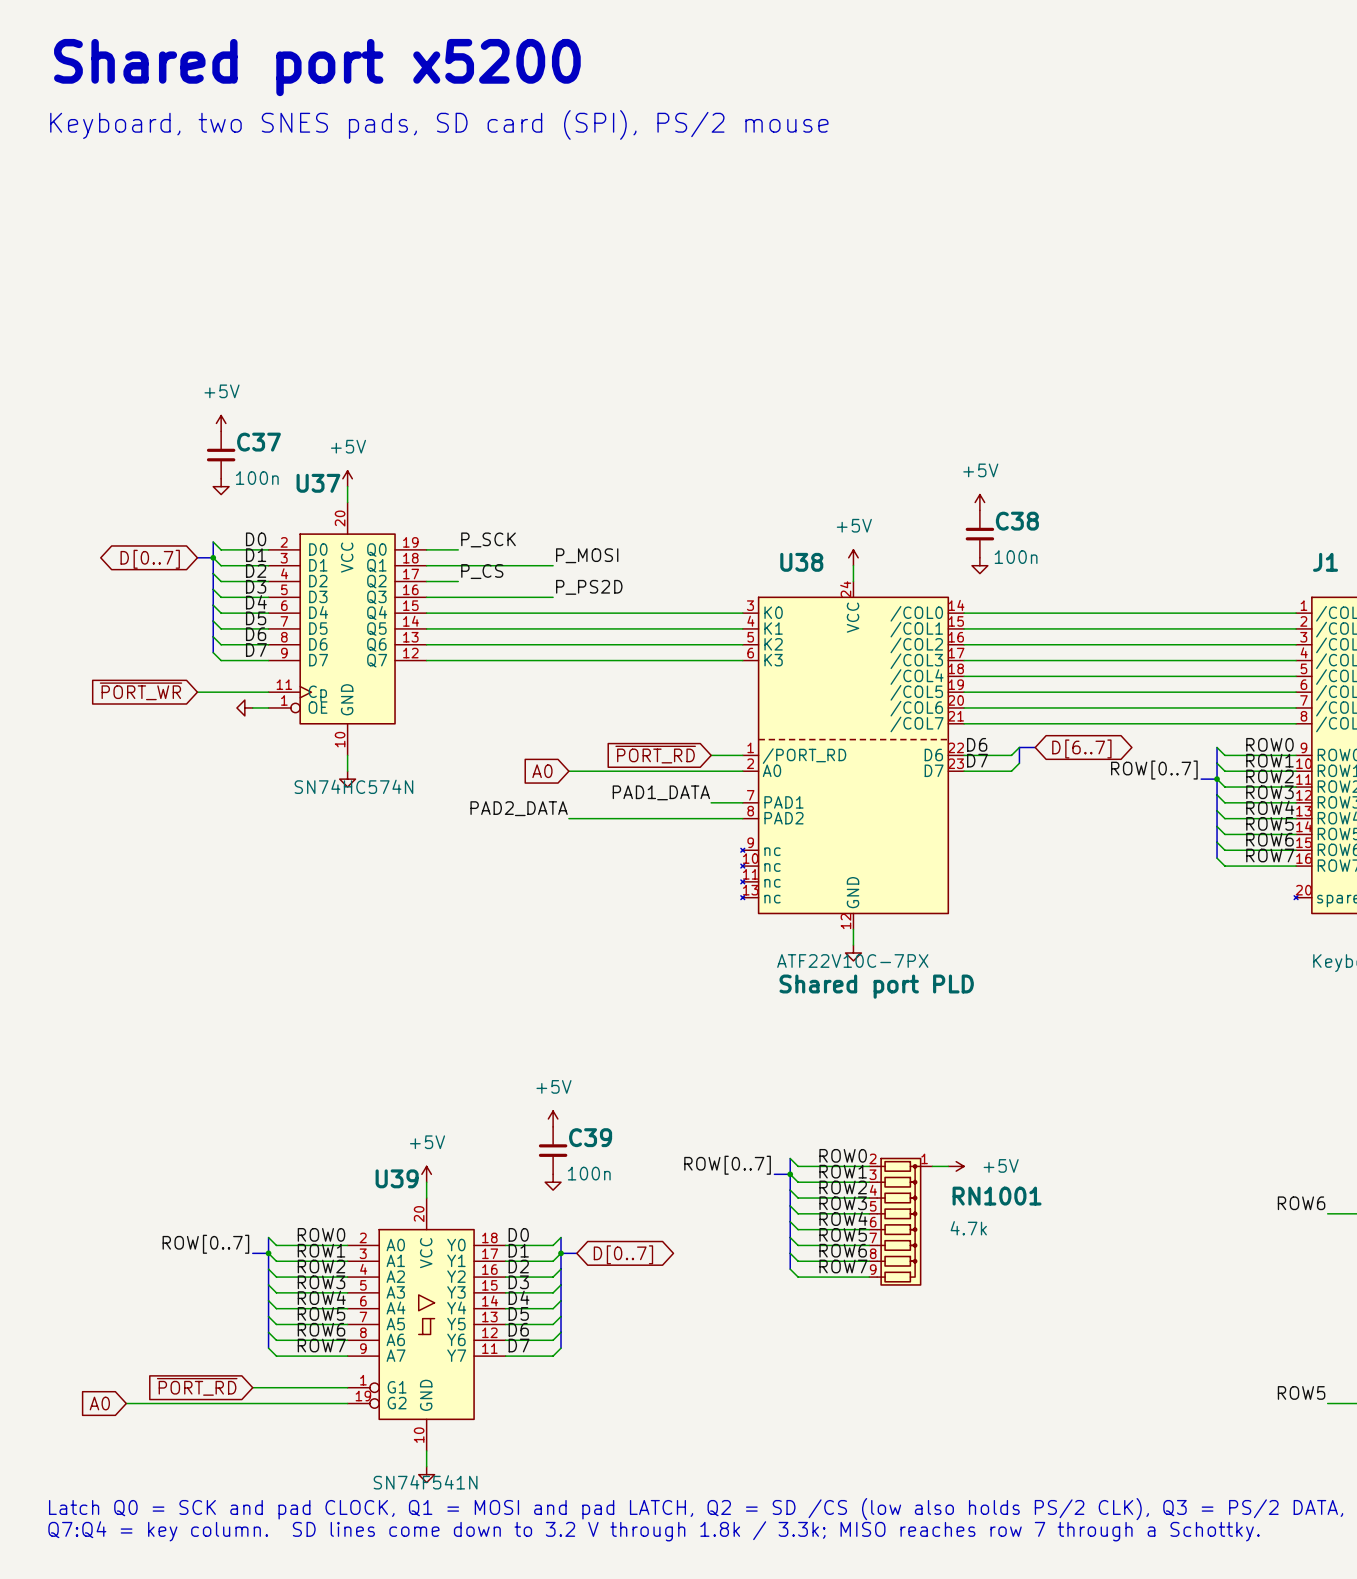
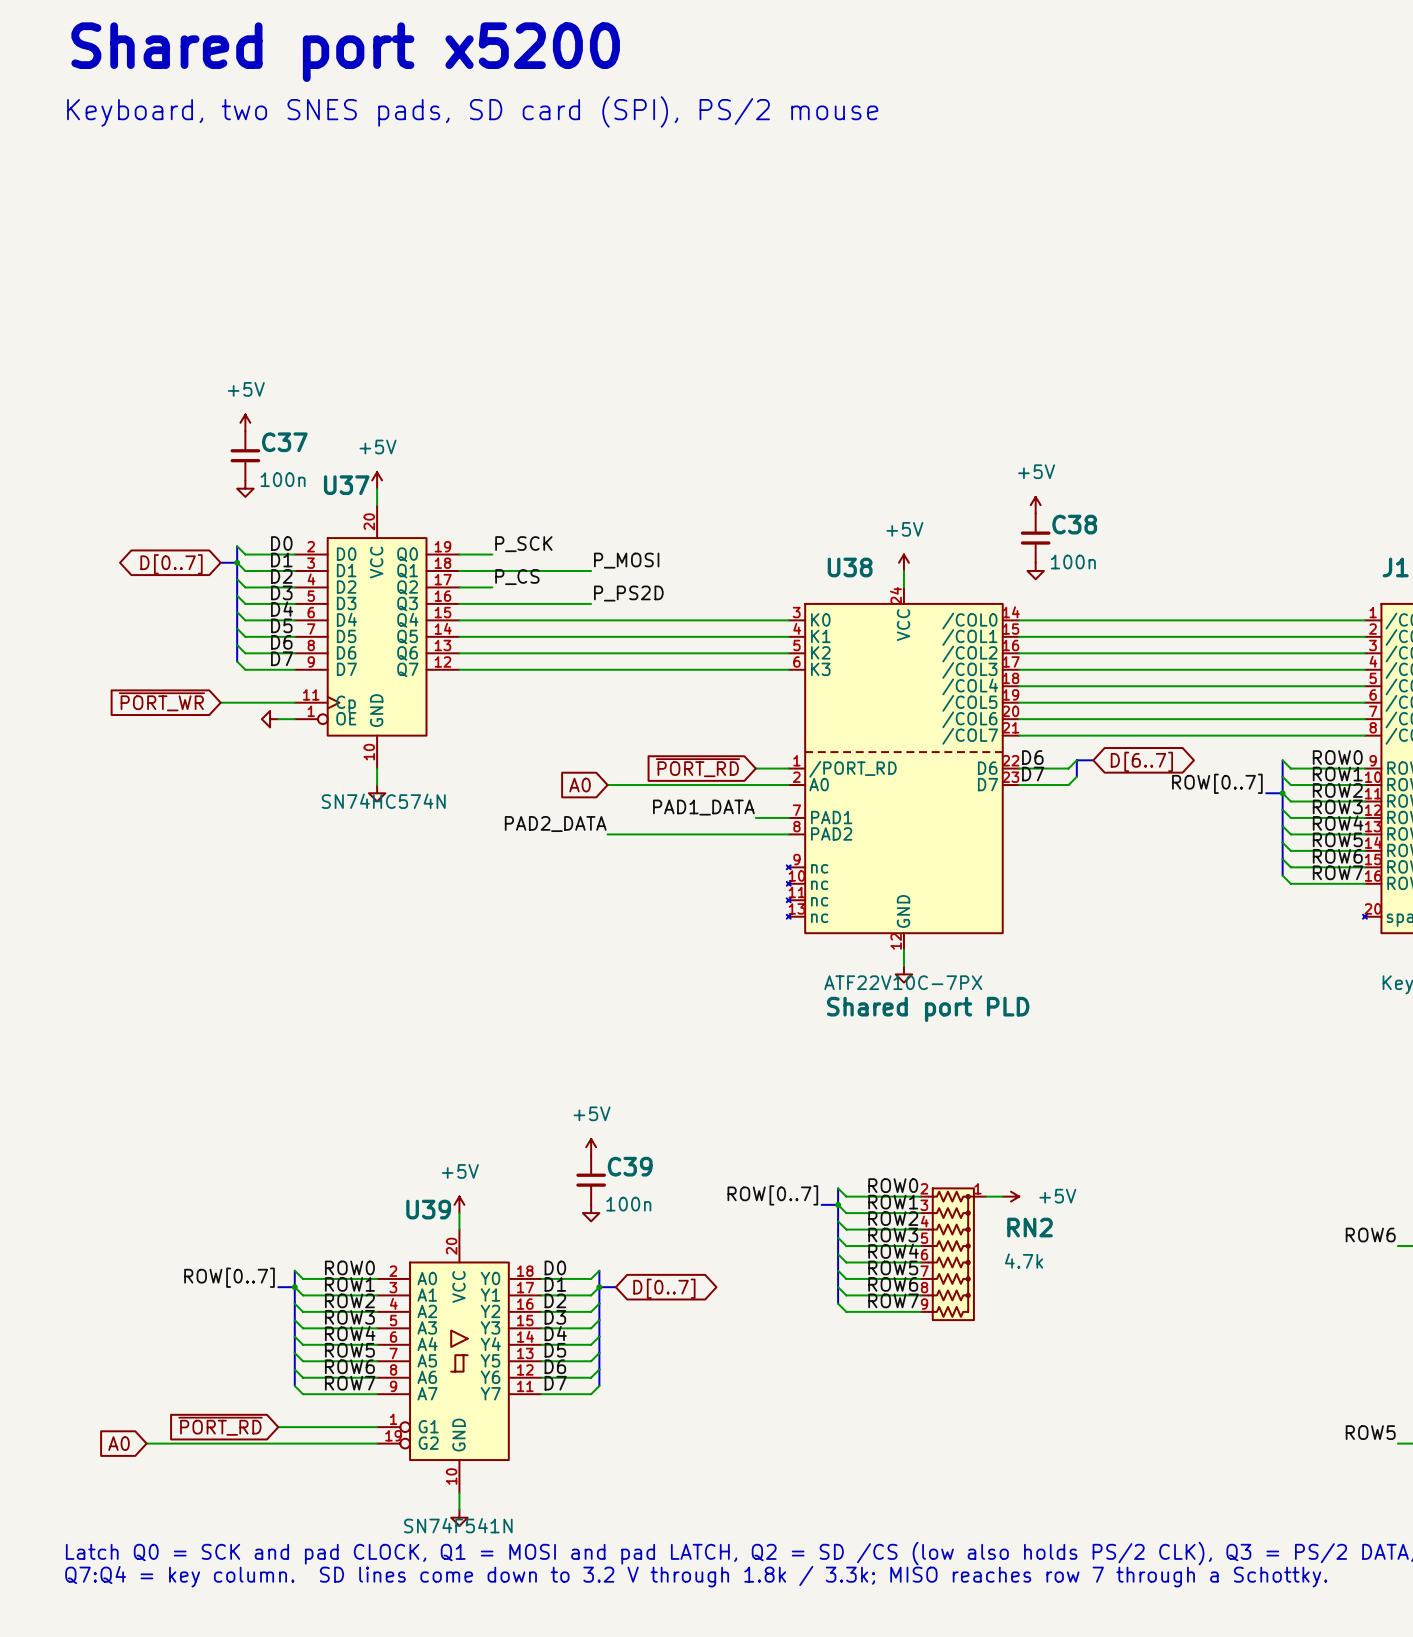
RN1001: 4.7k (900, 1221) -> none
RN2: none -> 4.7k (953, 1254)

